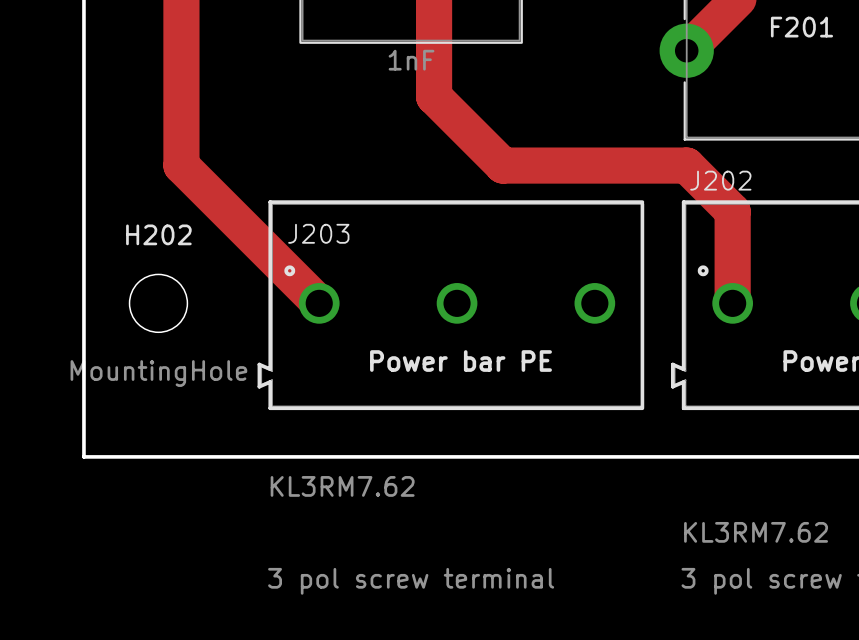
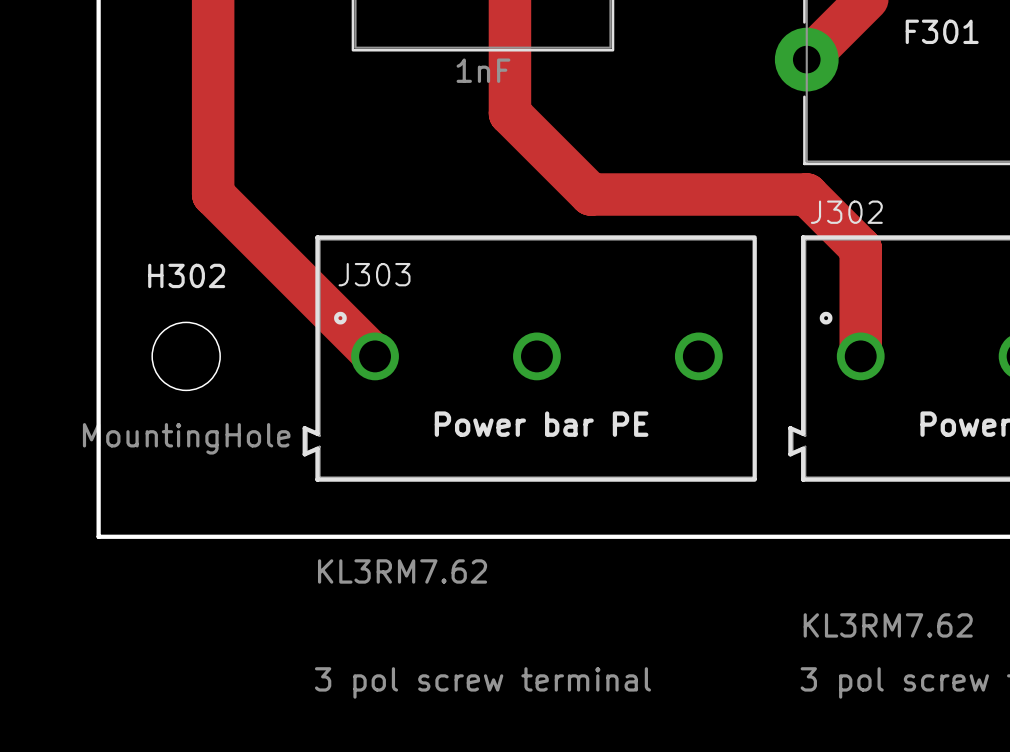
F201 name: F201 (801, 27) -> F301 (942, 31)
J202 name: J202 (720, 180) -> J302 (846, 212)
J203 name: J203 (318, 233) -> J303 (374, 274)
H202 name: H202 (158, 234) -> H302 (186, 275)

